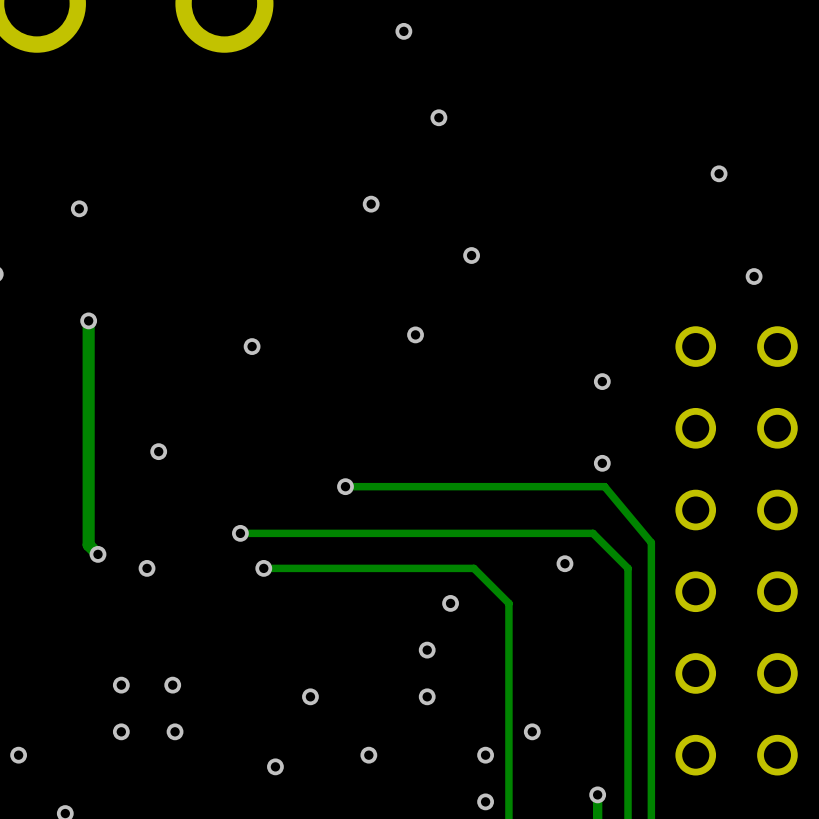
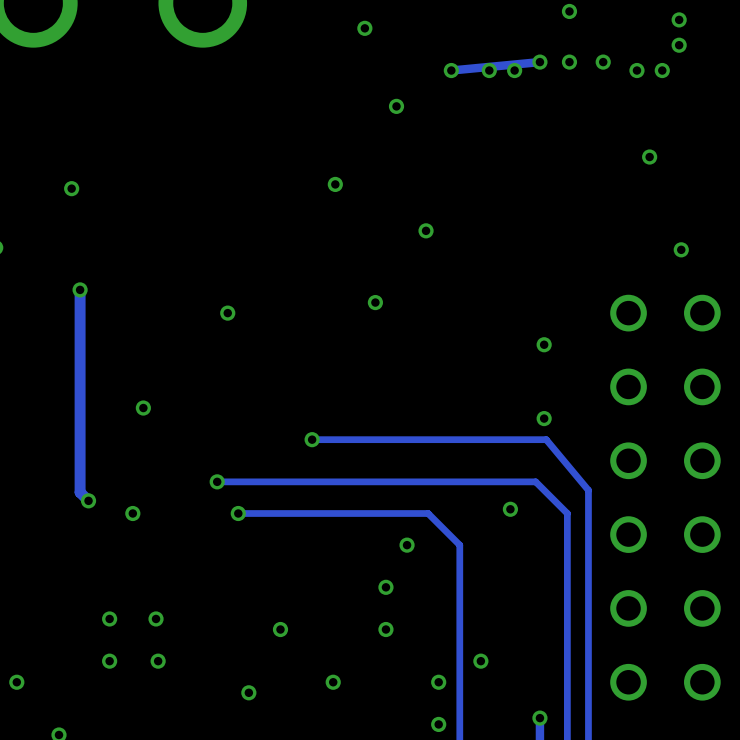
via: none -> (569, 11)
via: none -> (679, 19)
via: none -> (679, 45)
track: none -> (539, 62) (451, 70)
via: none -> (539, 62)
via: none -> (569, 62)
via: none -> (603, 62)
via: none -> (451, 70)
via: none -> (489, 70)
via: none -> (514, 70)
via: none -> (636, 70)
via: none -> (662, 70)

